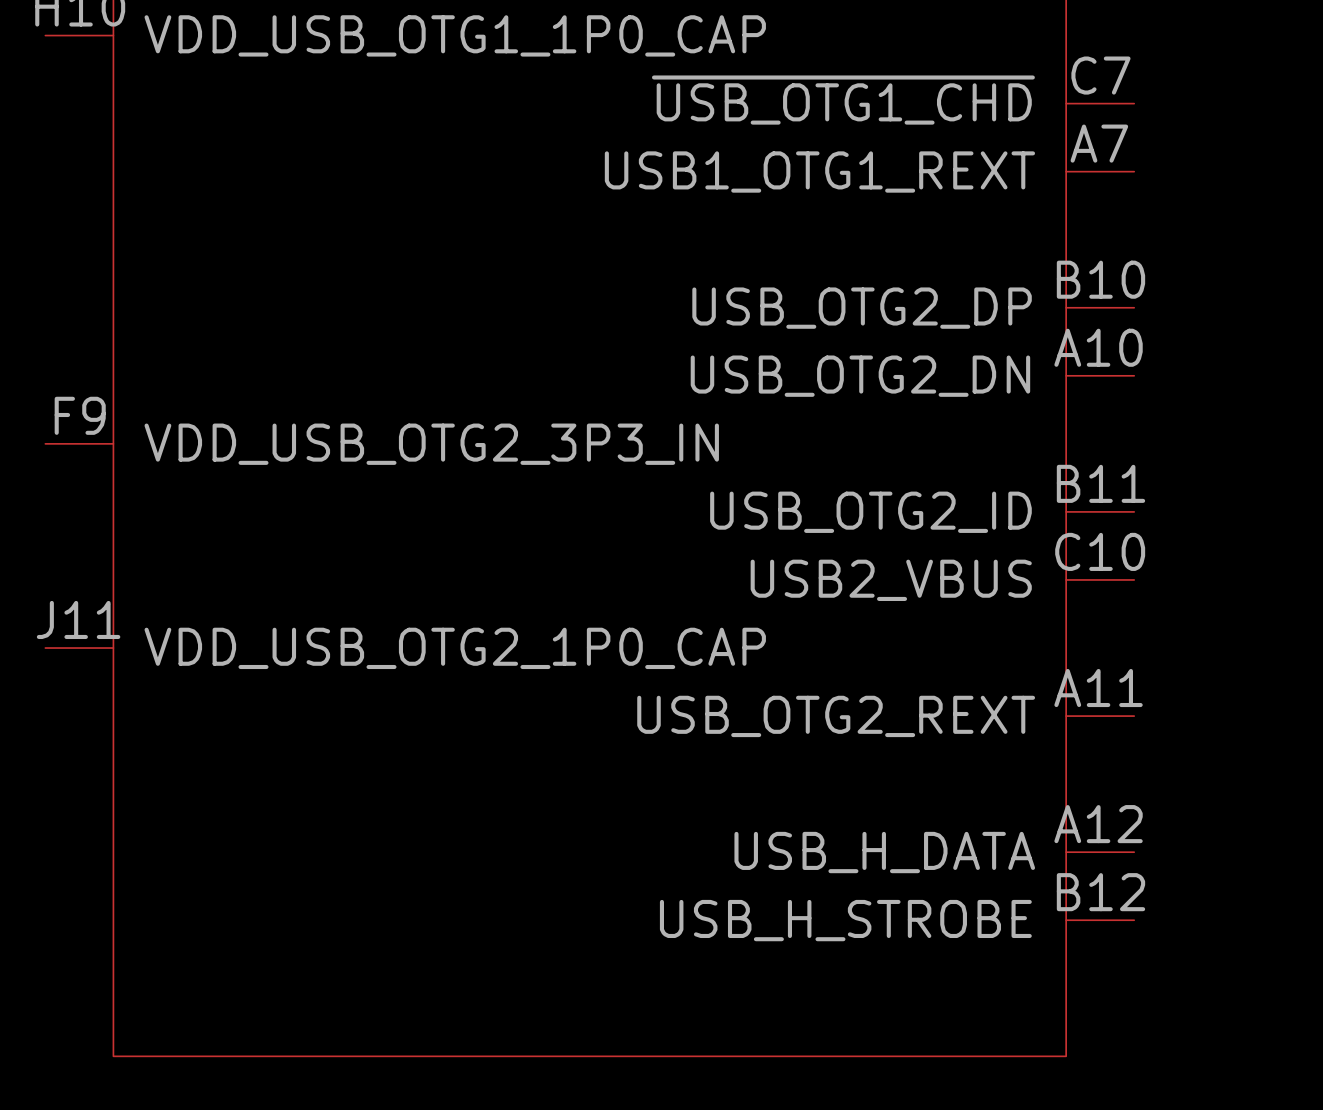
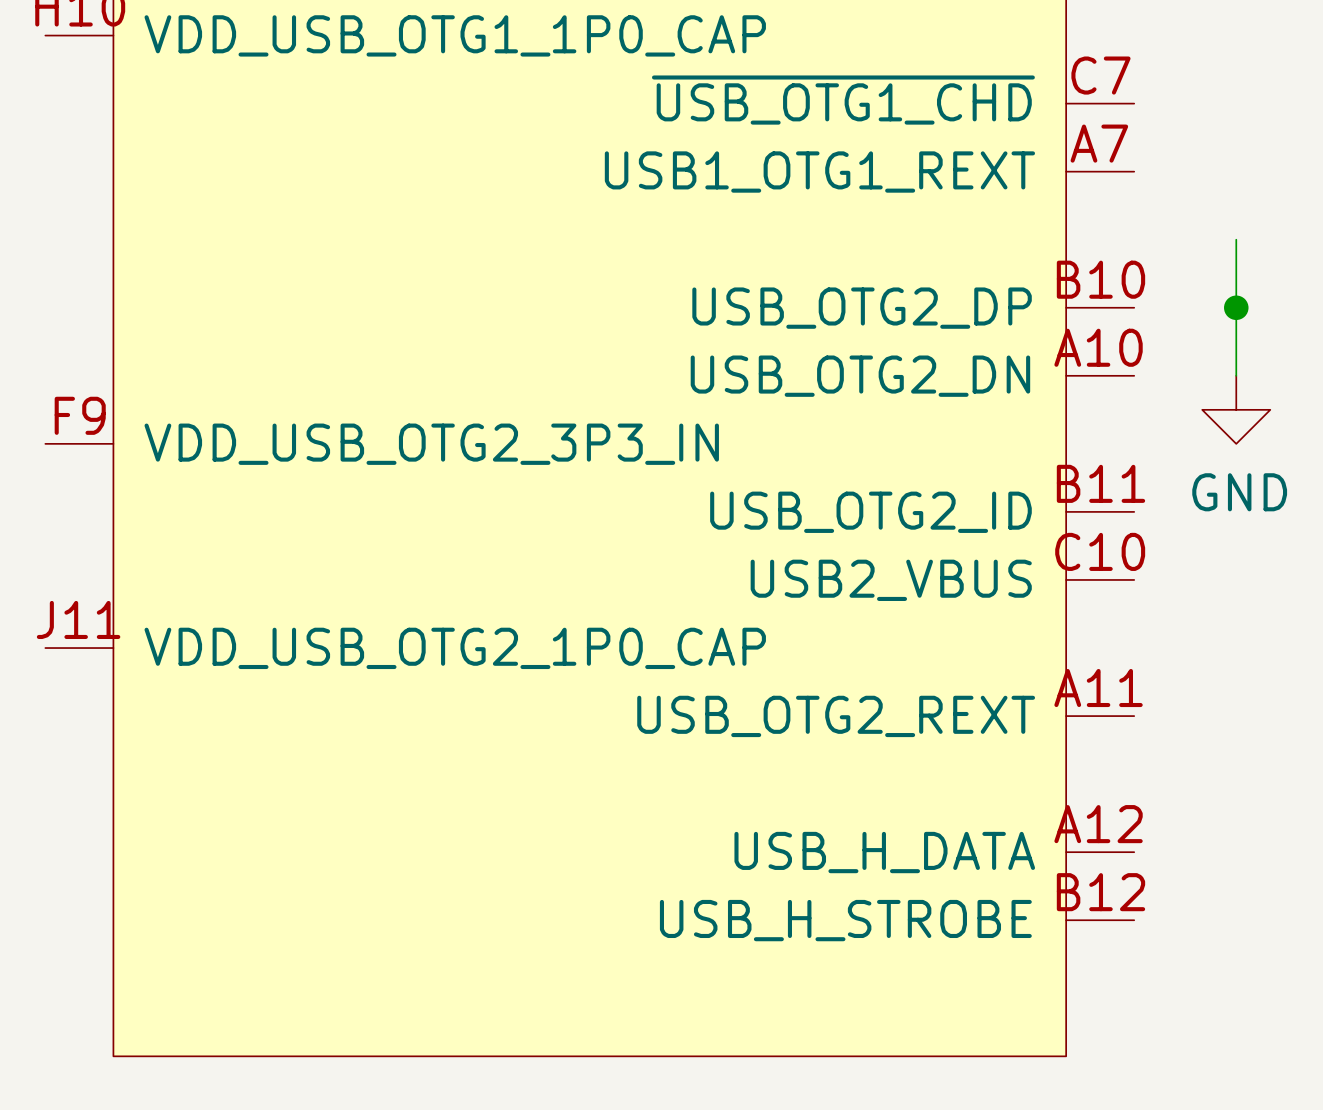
wire: none -> (1236, 239) (1236, 375)
junction: none -> (1236, 307)
power symbol: none -> GND (1236, 409)

